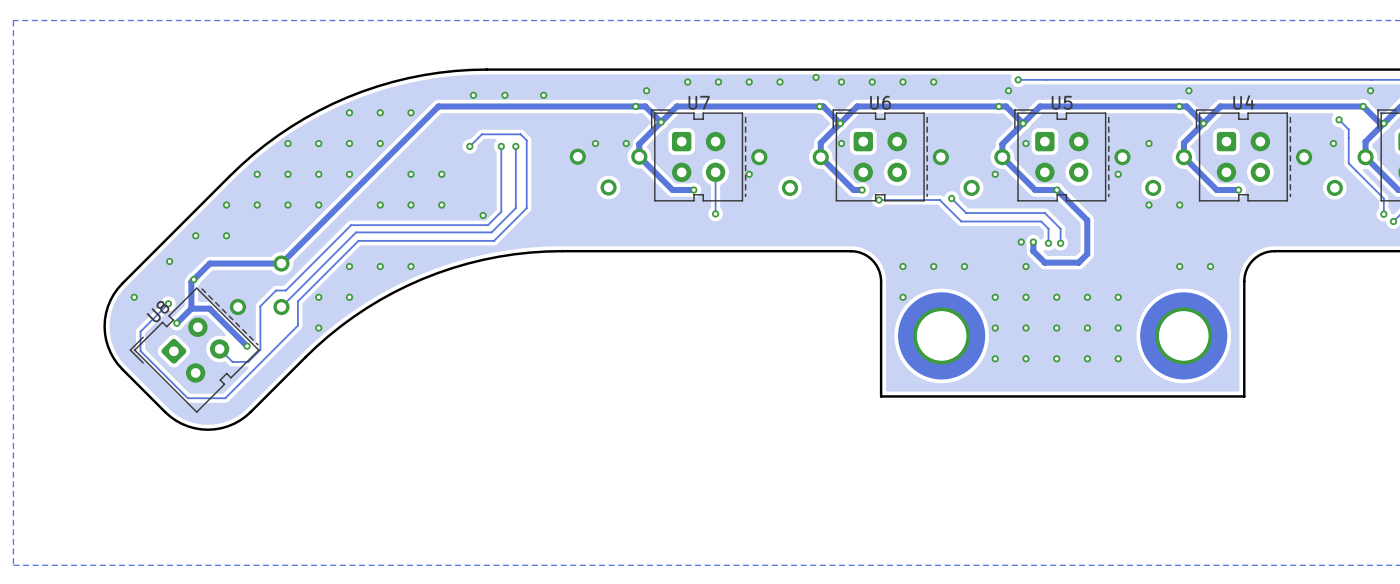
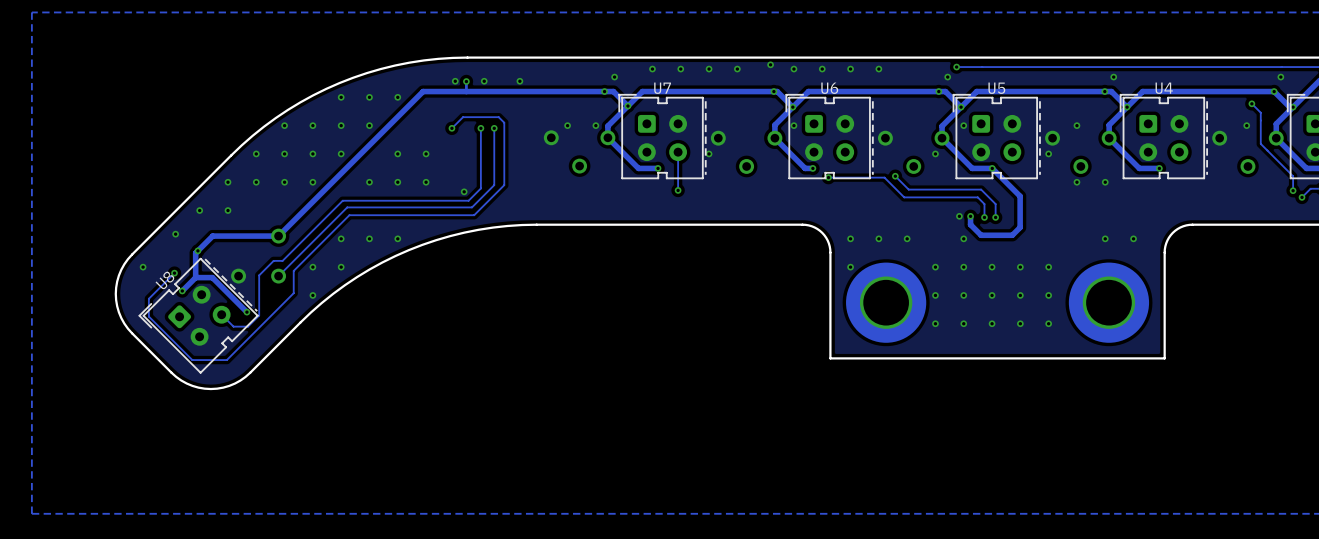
track: none -> (466, 81) (466, 91)
via: none -> (466, 81)

